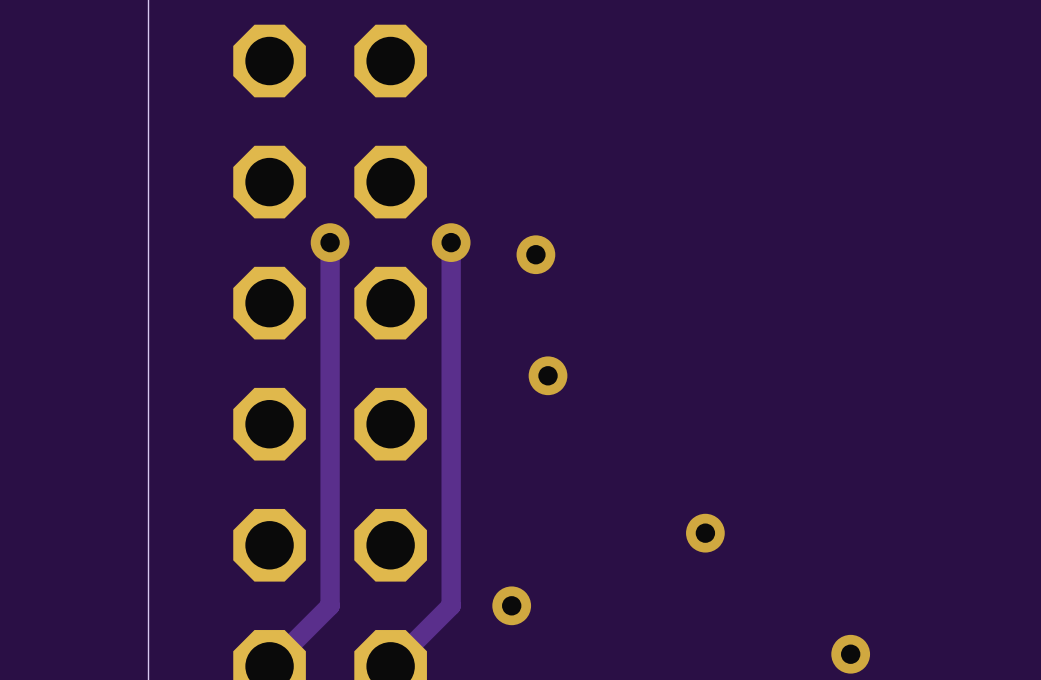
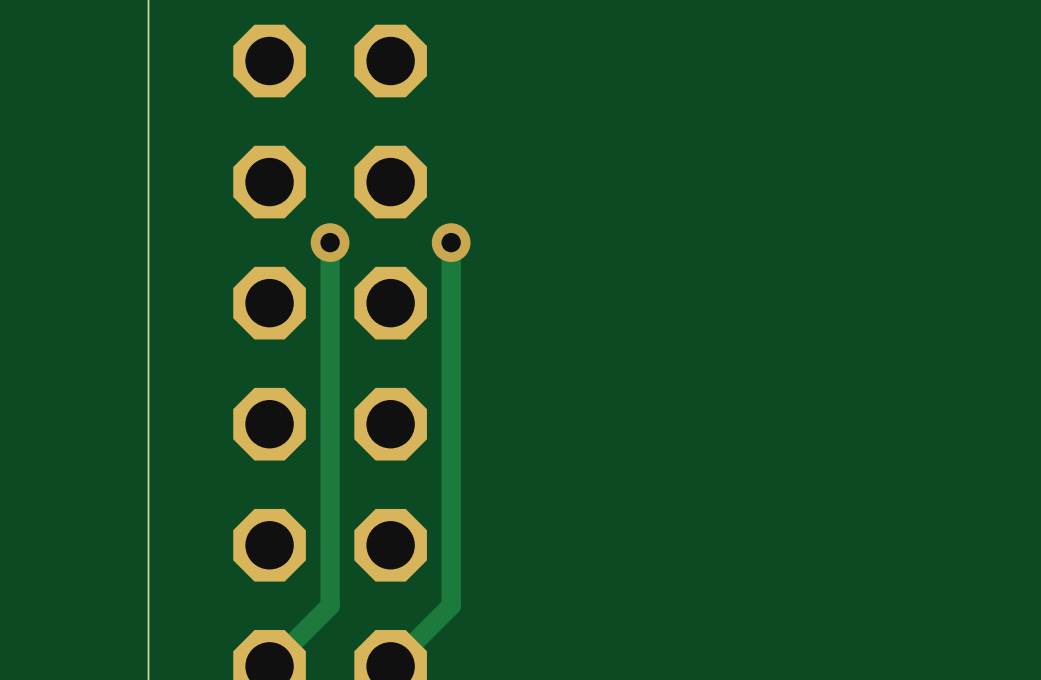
via: (535, 254) -> none
via: (548, 375) -> none
via: (705, 533) -> none
via: (511, 605) -> none
via: (850, 654) -> none

